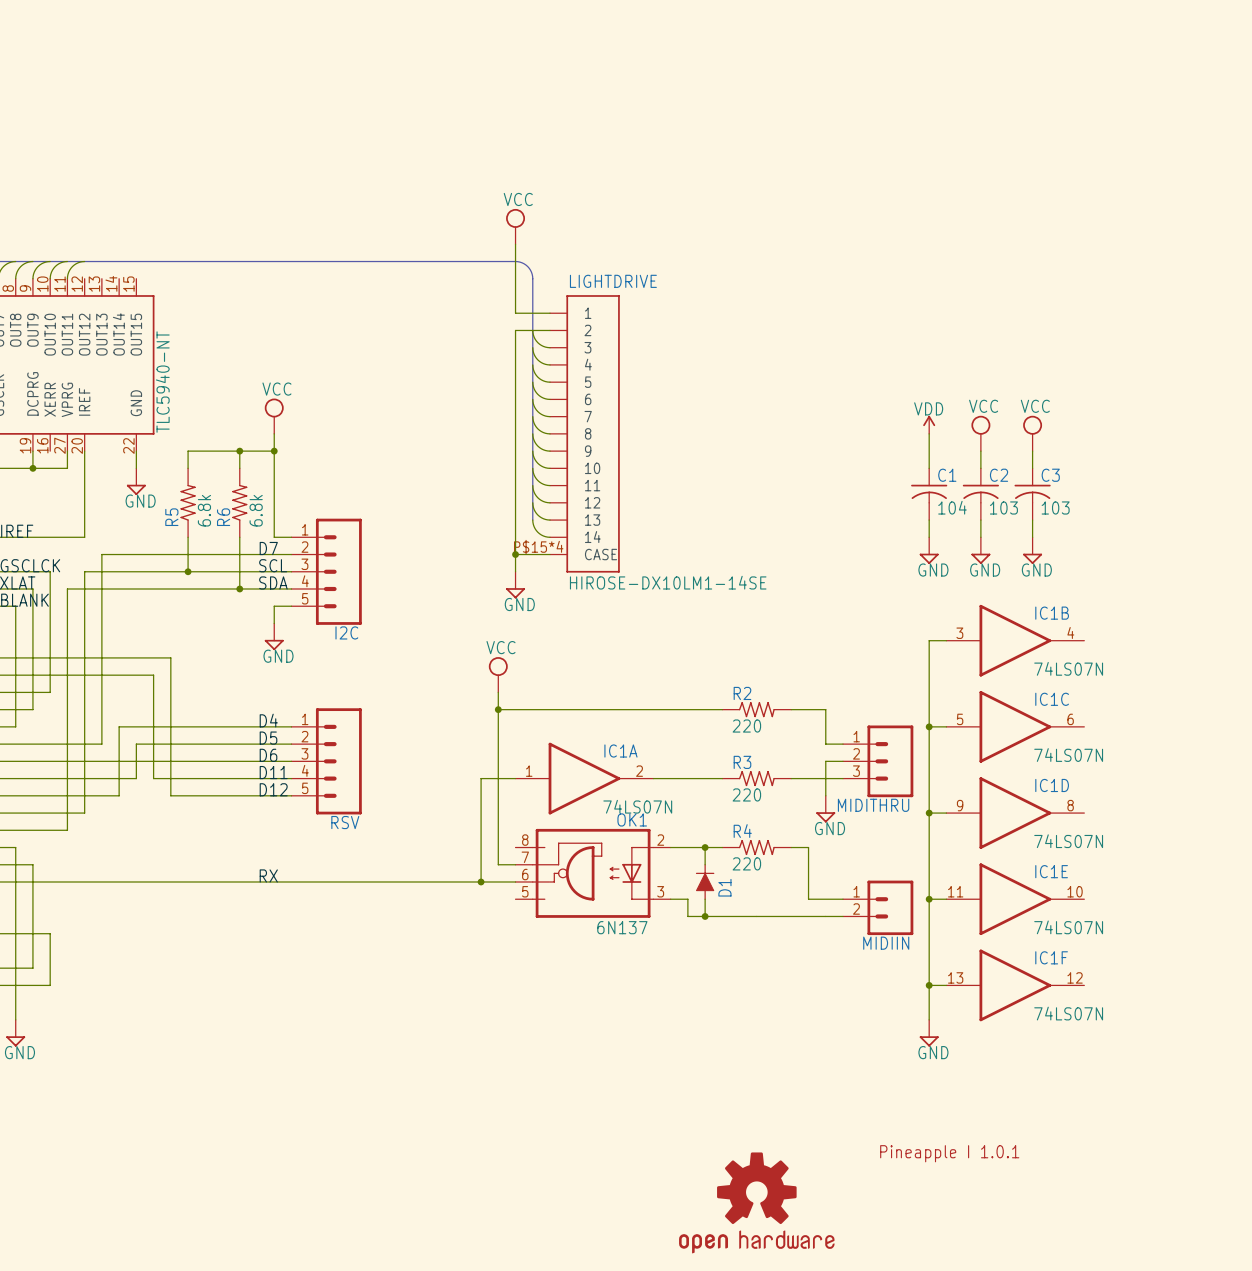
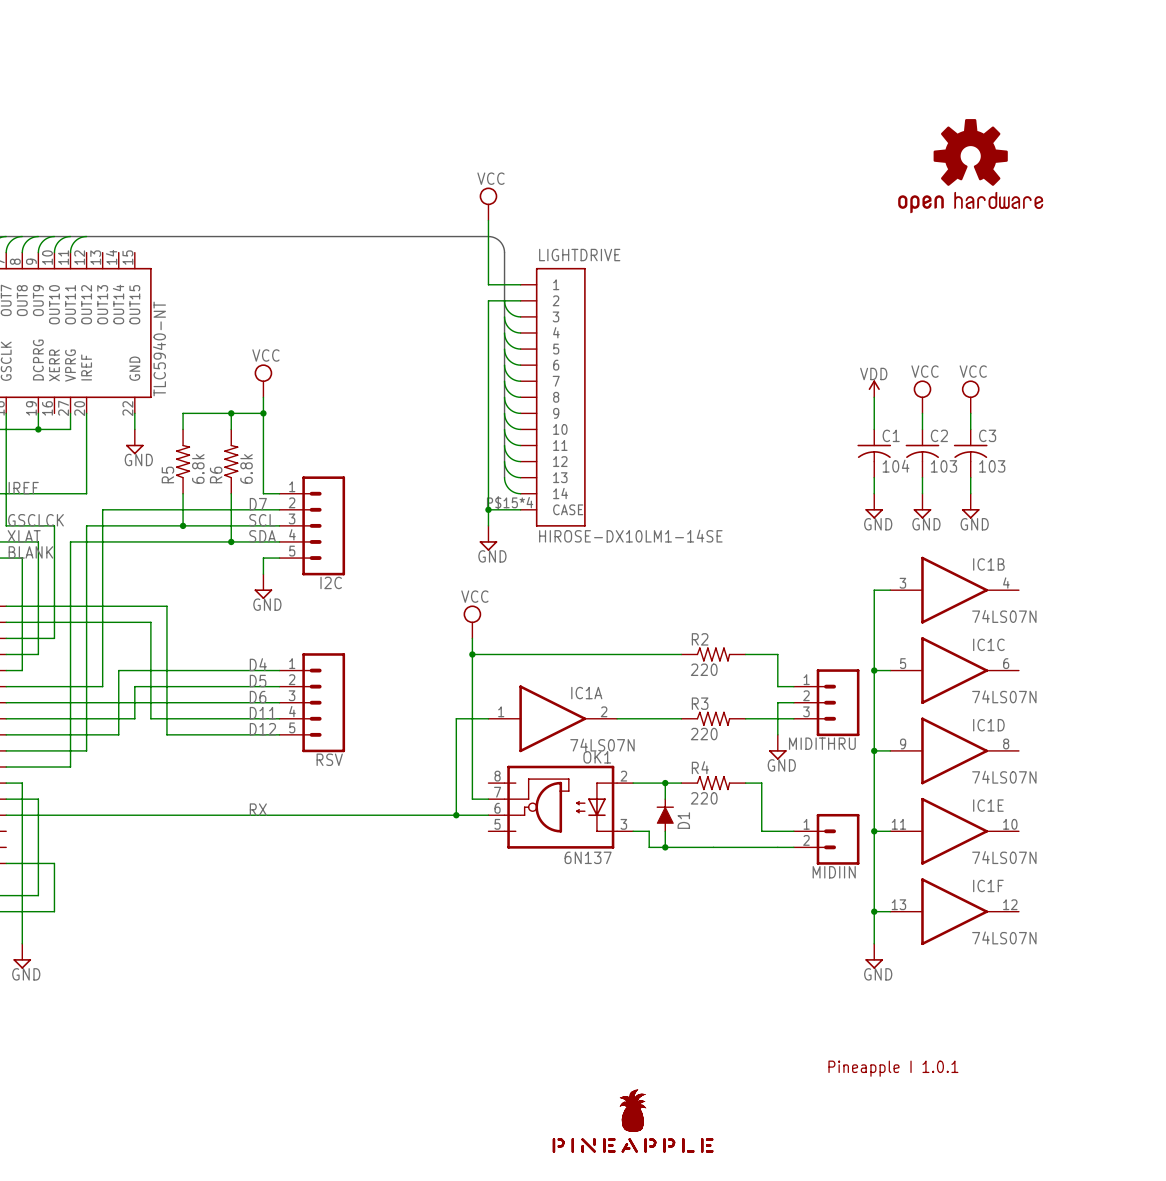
part: none -> (970, 166)
part: (756, 1202) -> none
part: none -> (633, 1121)

